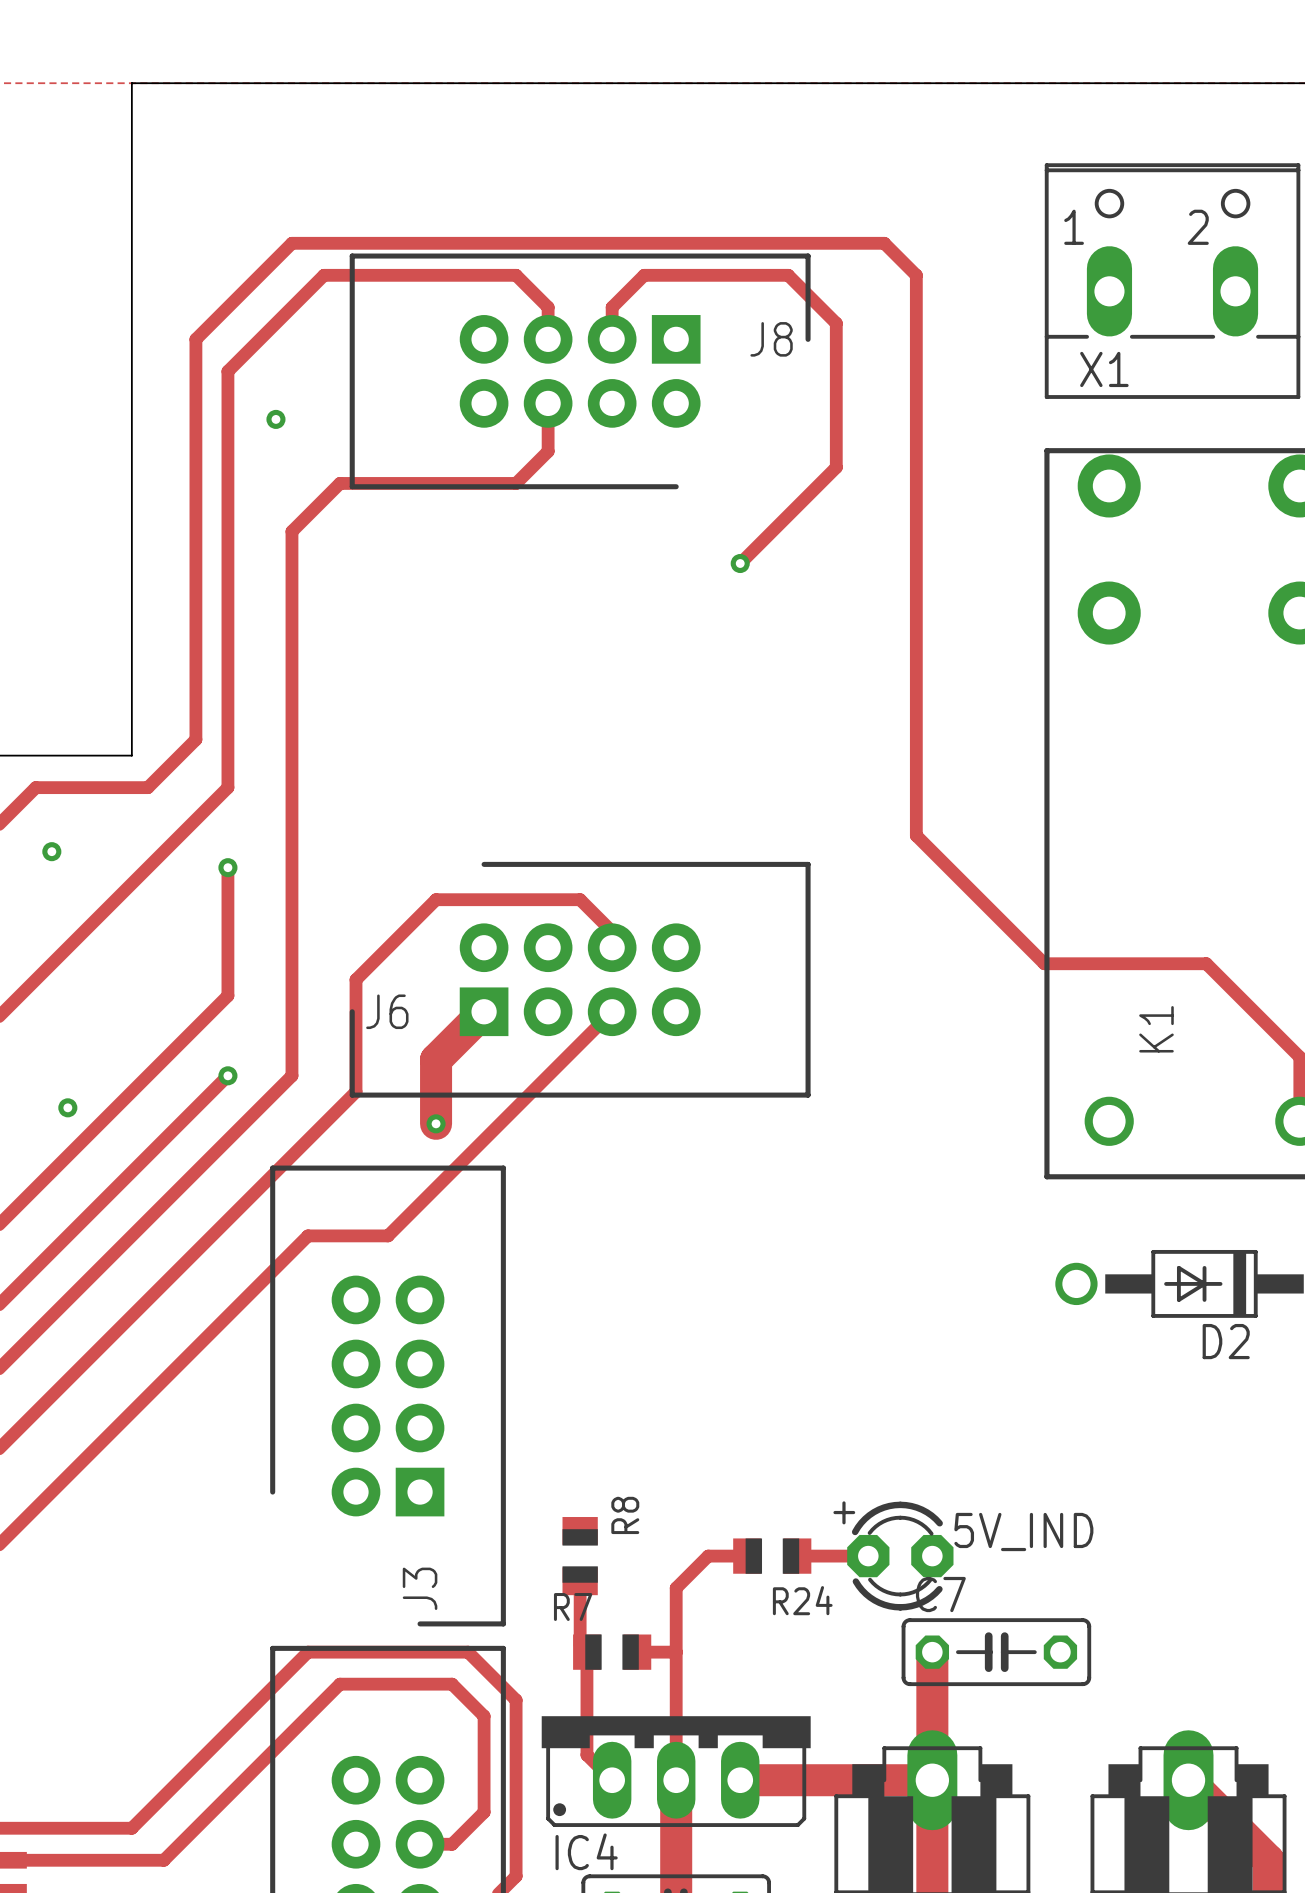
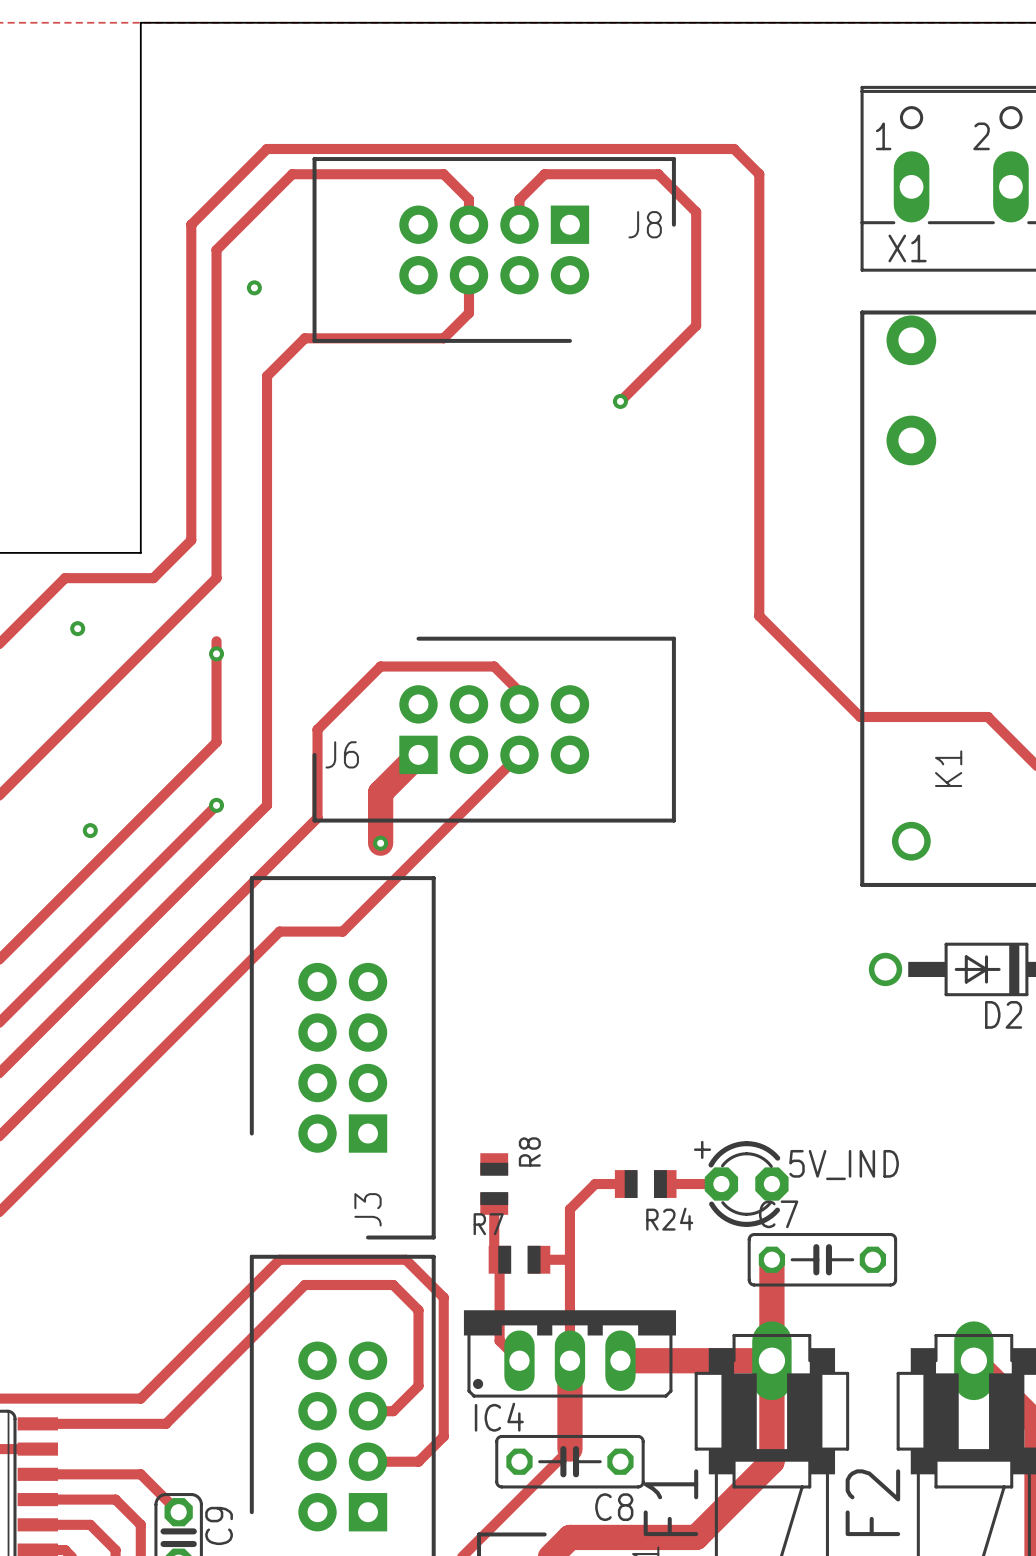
via position: (227, 867) -> (216, 653)

